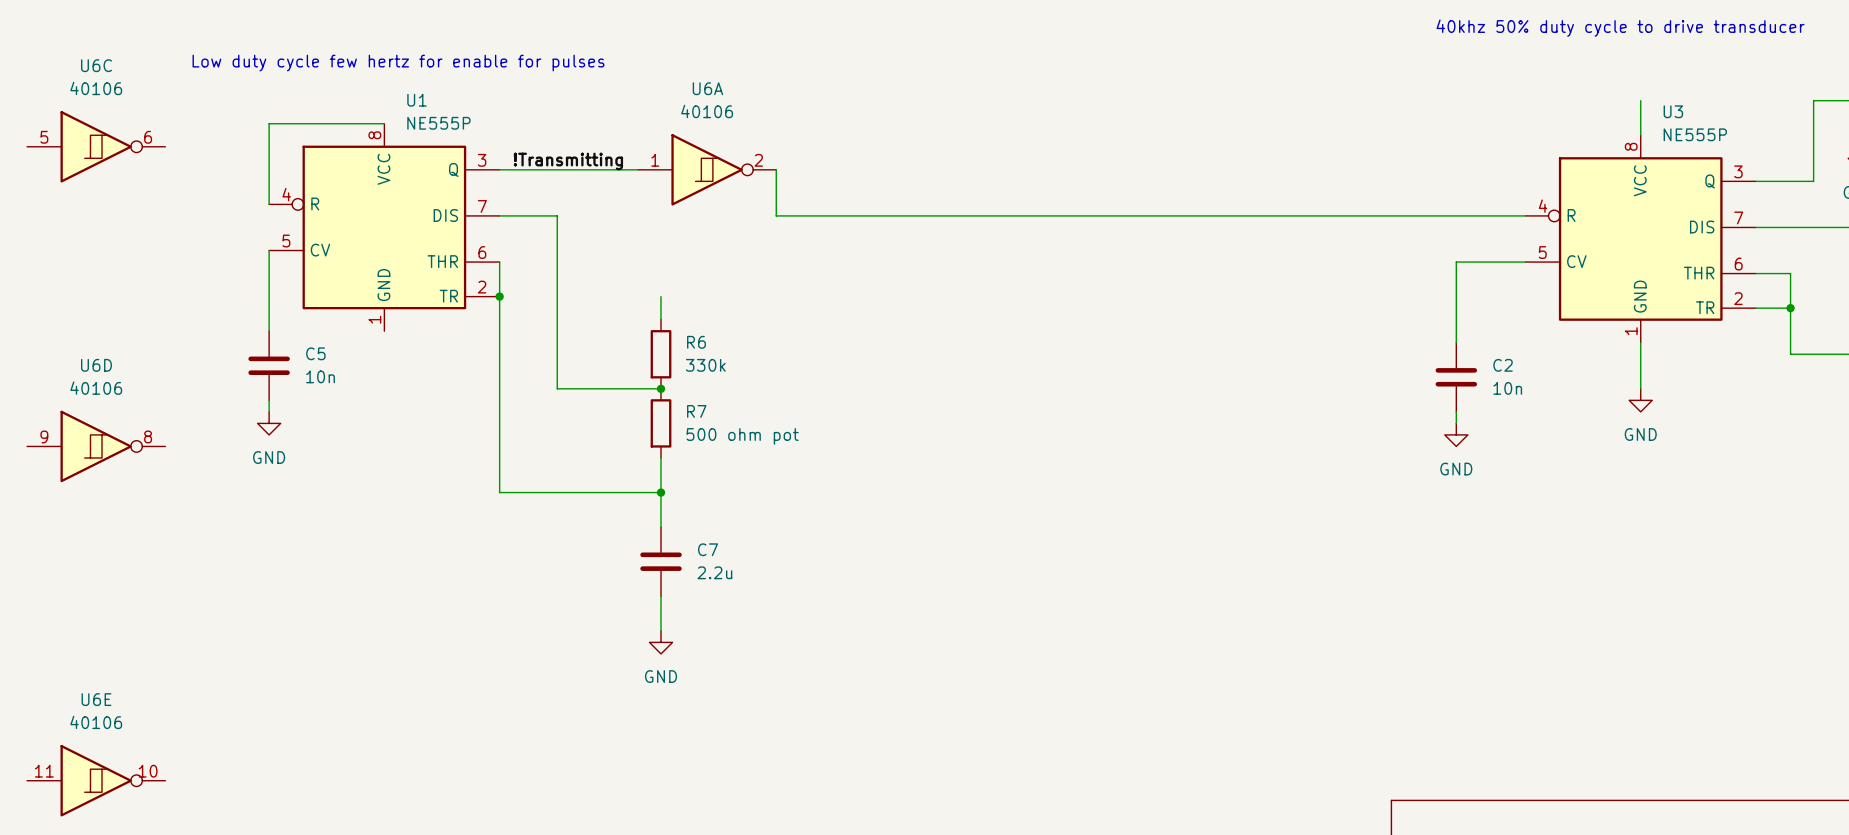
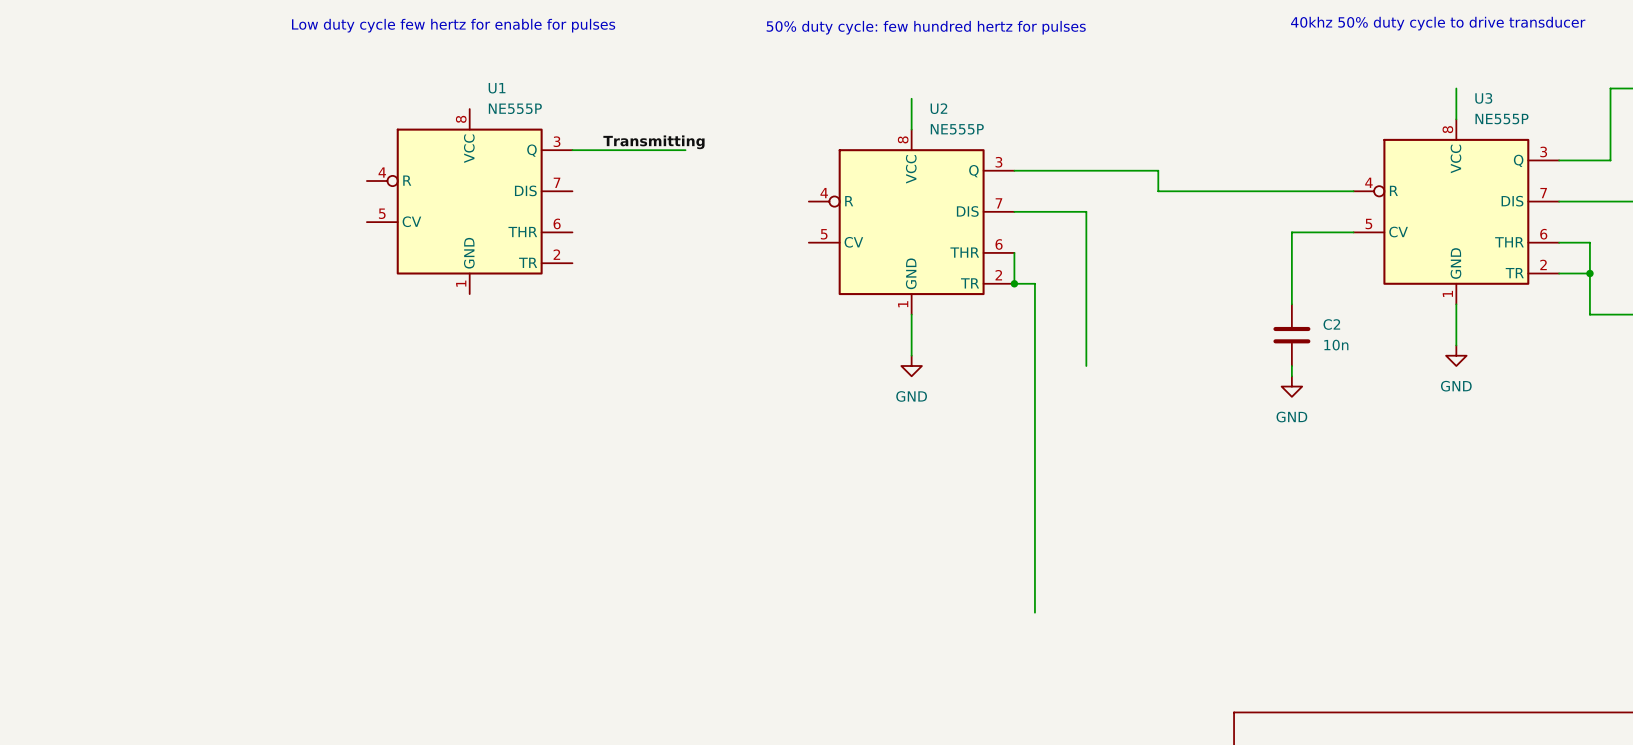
text: none -> 50% duty cycle: few hundred hertz for pulses (926, 27)
text position: Low duty cycle few hertz for enable for pulses (398, 63) -> Low duty cycle few hertz for enable for pulses (453, 25)
wire: none -> (911, 98) (911, 129)
wire: (384, 123) (269, 123) (269, 204) -> none
U6C: 40106 (96, 146) -> none
label: !Transmitting (568, 161) -> none
label: none -> Transmitting (653, 142)
U6A: 40106 (707, 169) -> none
wire: (776, 169) (776, 215) (1306, 215) -> (1014, 170) (1158, 170) (1158, 191)
wire: (499, 215) (557, 215) (557, 388) (661, 388) -> none
U1 position: (384, 227) -> (469, 201)
wire: none -> (1014, 211) (1086, 211) (1086, 366)
wire: (269, 250) (269, 331) -> none
U2: none -> NE555P (911, 222)
wire: (499, 262) (499, 492) (661, 492) -> none
wire: none -> (1014, 252) (1014, 283) (1034, 283) (1034, 612)
junction: (499, 296) -> none
wire: (661, 296) (661, 319) -> none
junction: none -> (1014, 283)
R6: 330k (661, 354) -> none
wire: none -> (911, 314) (911, 355)
C5: 10n (269, 365) -> none
junction: (661, 388) -> none
wire: (269, 400) (269, 411) -> none
power symbol: none -> GND (911, 366)
power symbol: GND (269, 423) -> none
R7: 500 ohm pot (661, 423) -> none
U6D: 40106 (96, 446) -> none
wire: (661, 457) (661, 527) -> none
junction: (661, 492) -> none
C7: 2.2u (661, 561) -> none
wire: (661, 596) (661, 630) -> none
power symbol: GND (661, 642) -> none
U6E: 40106 (96, 780) -> none

